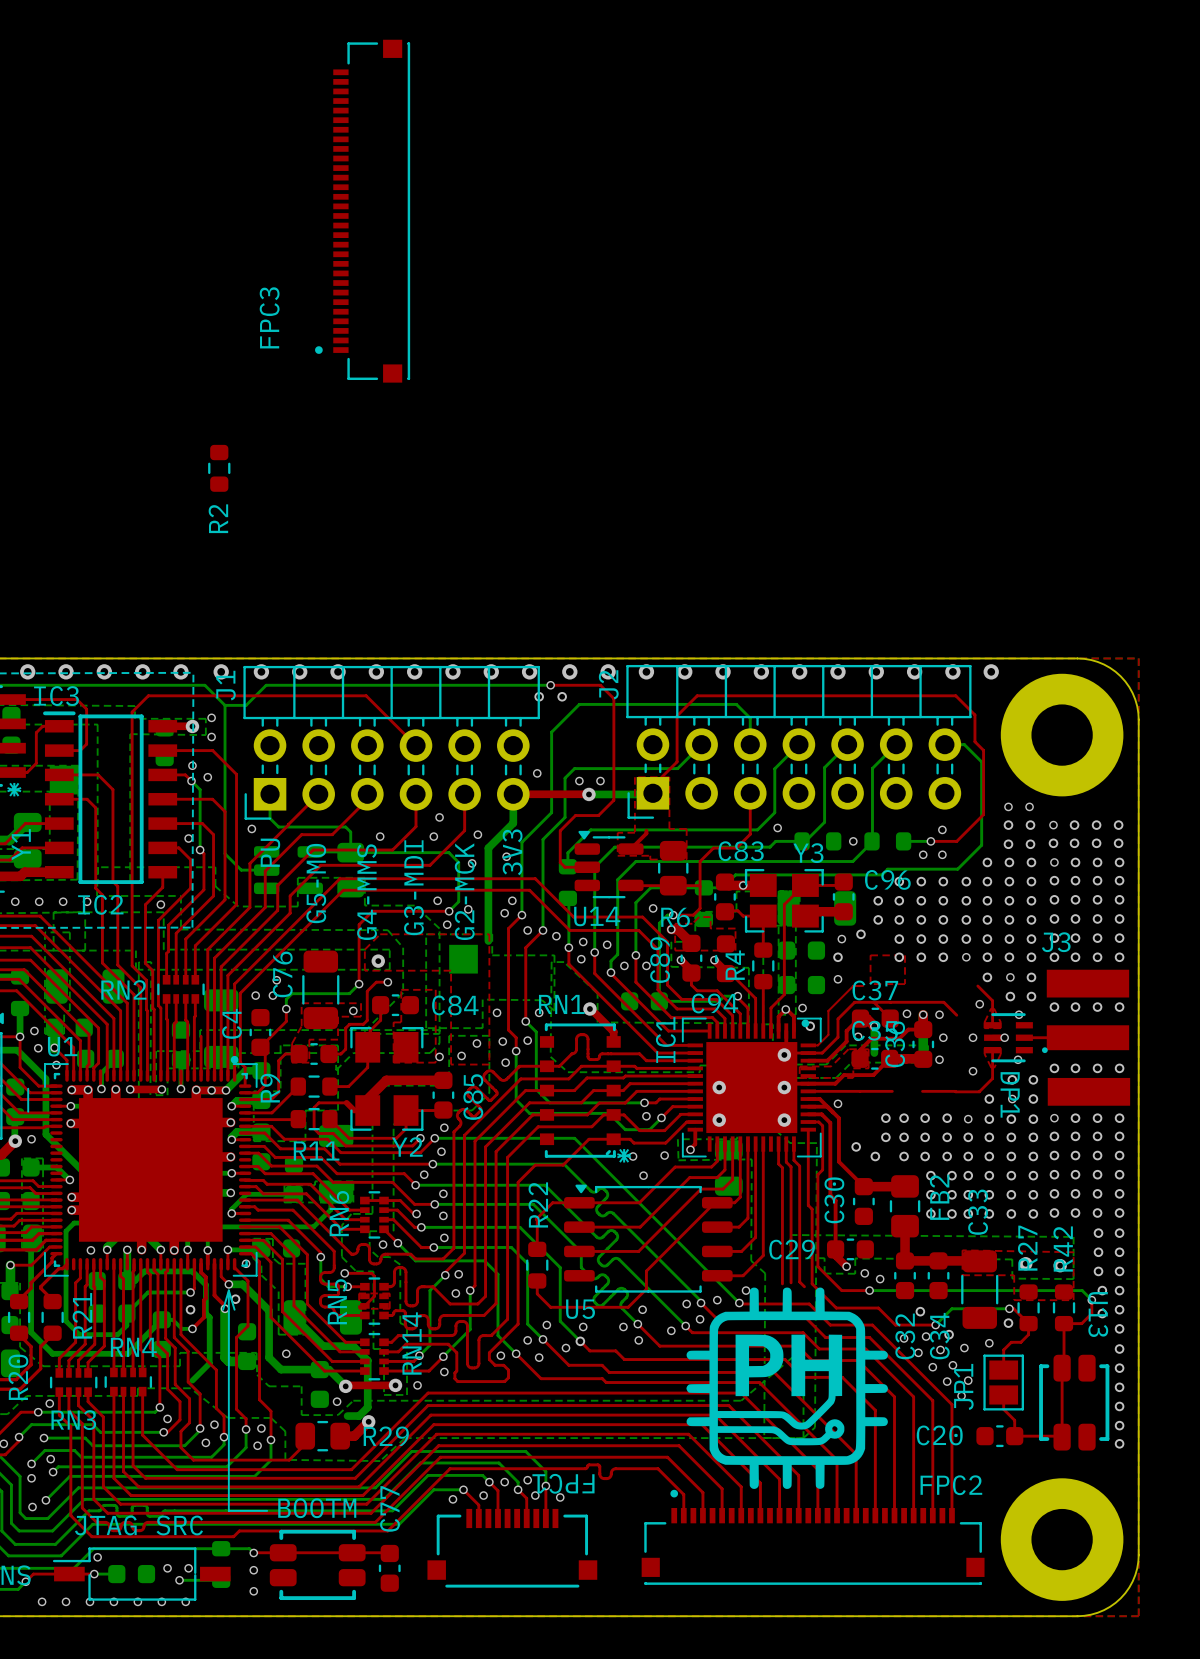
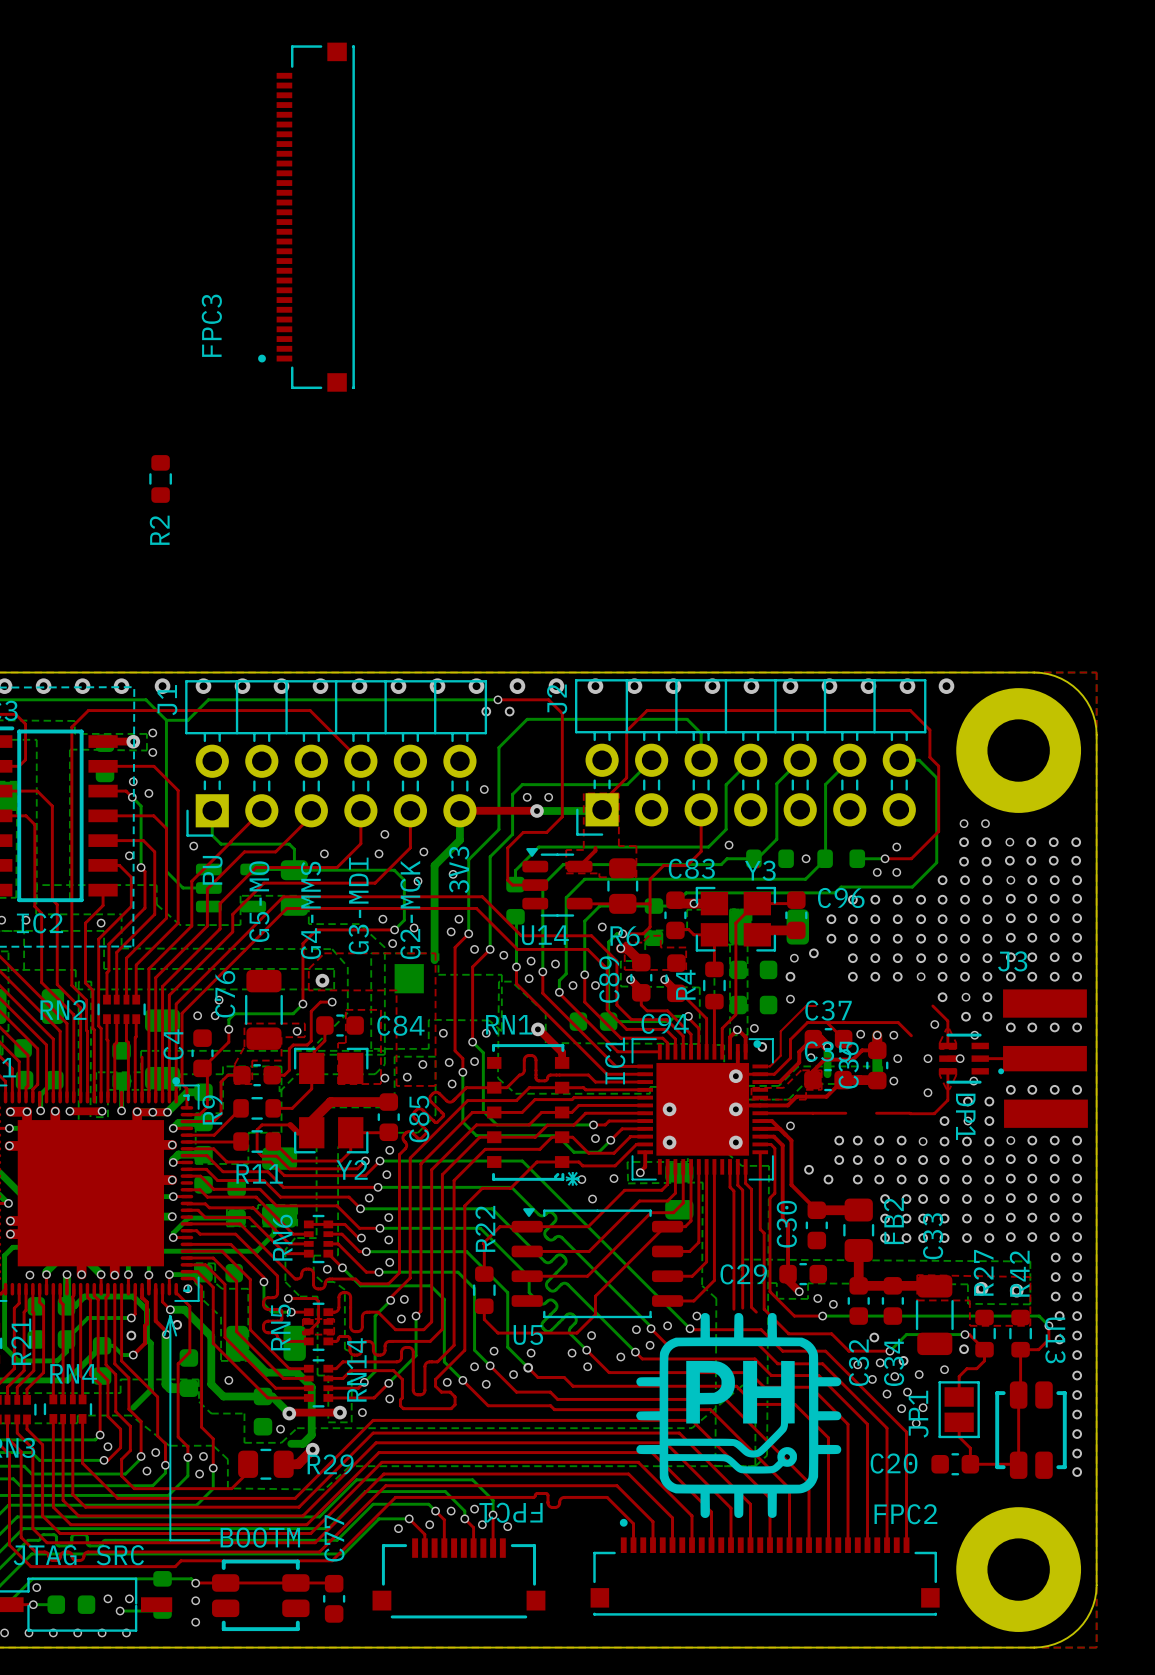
top zone outline: (870, 955) (905, 955) (905, 984) (870, 984) (870, 955) -> none

